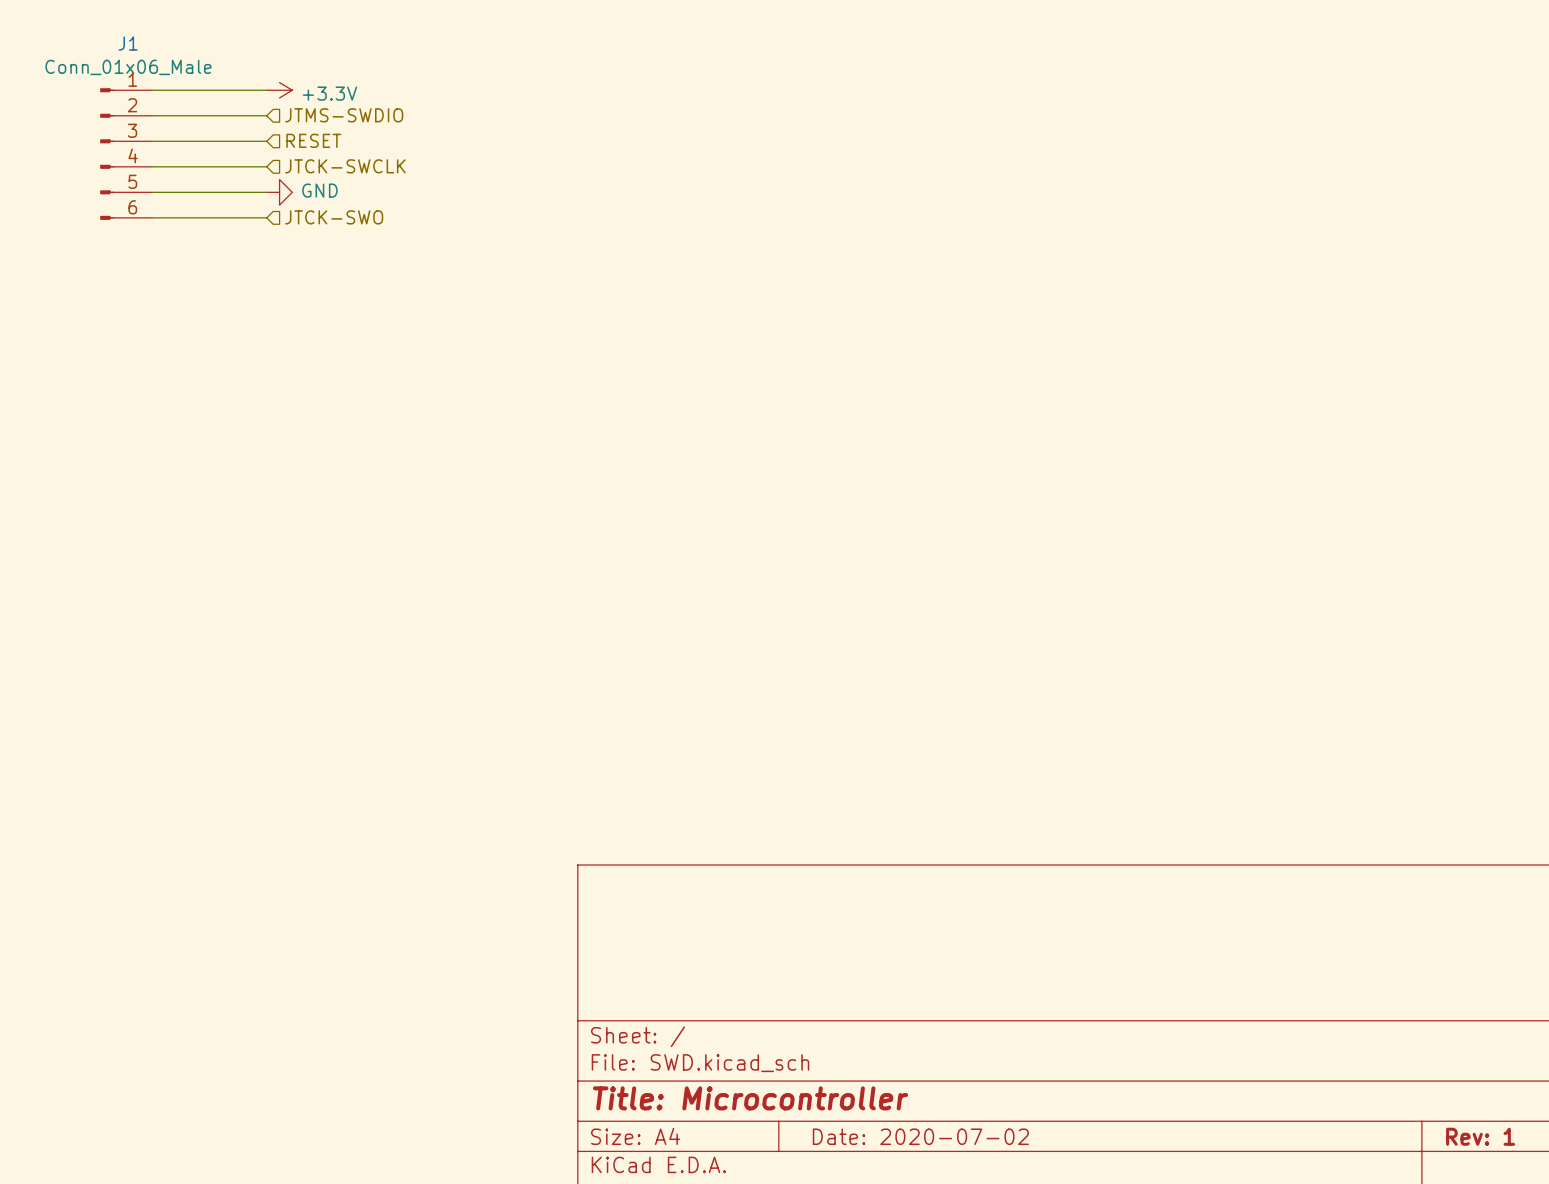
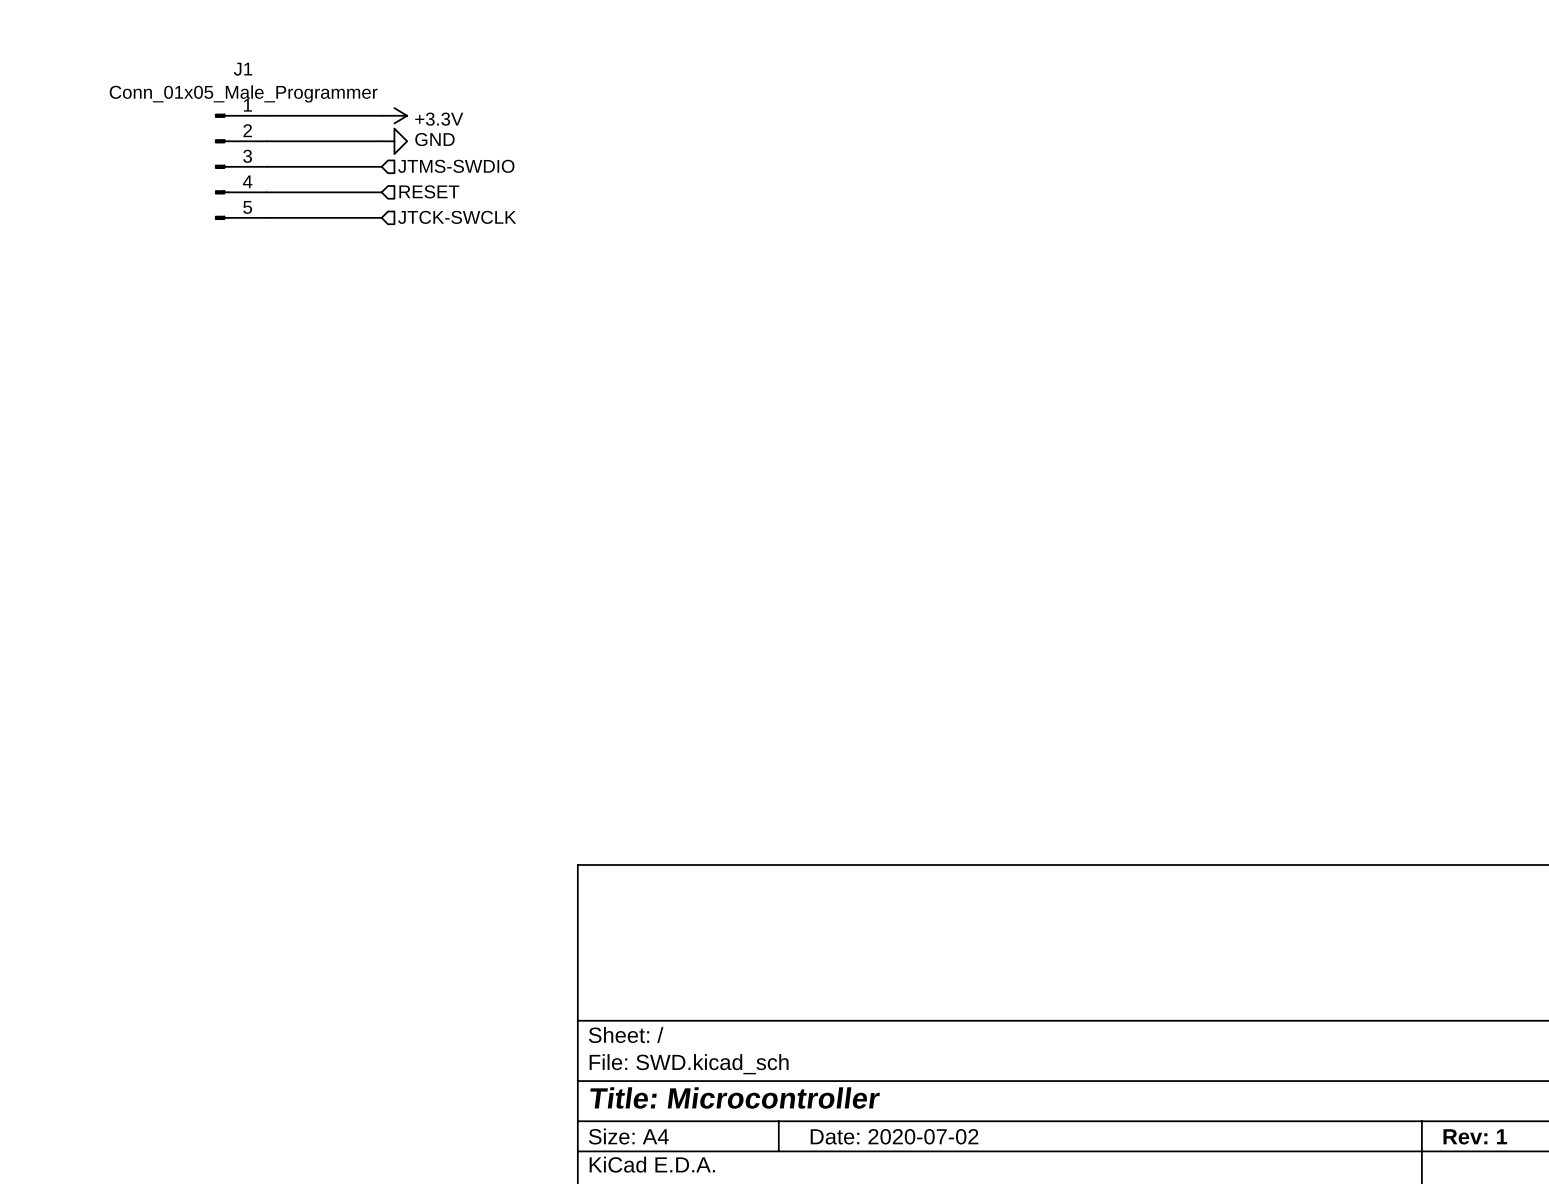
J1 value: Conn_01x06_Male (128, 67) -> Conn_01x05_Male_Programmer (243, 93)
J1 symbol: [100, 88, 152, 220] -> [215, 113, 267, 220]
wire: (151, 90) (266, 90) -> none
power symbol position: +3.3V (279, 90) -> +3.3V (394, 115)
wire: (151, 115) (266, 115) -> (381, 115) (266, 115)
hierarchical label position: JTMS-SWDIO (344, 115) -> JTMS-SWDIO (456, 166)
hierarchical label position: RESET (313, 140) -> RESET (429, 191)
wire: (151, 141) (266, 141) -> (381, 141) (266, 141)
wire: (151, 166) (266, 166) -> (381, 166) (266, 166)
hierarchical label position: JTCK-SWCLK (345, 166) -> JTCK-SWCLK (457, 217)
wire: (151, 192) (266, 192) -> (381, 192) (266, 192)
power symbol position: GND (279, 192) -> GND (394, 141)
wire: (151, 217) (266, 217) -> (381, 217) (266, 217)
hierarchical label: JTCK-SWO (334, 217) -> none

